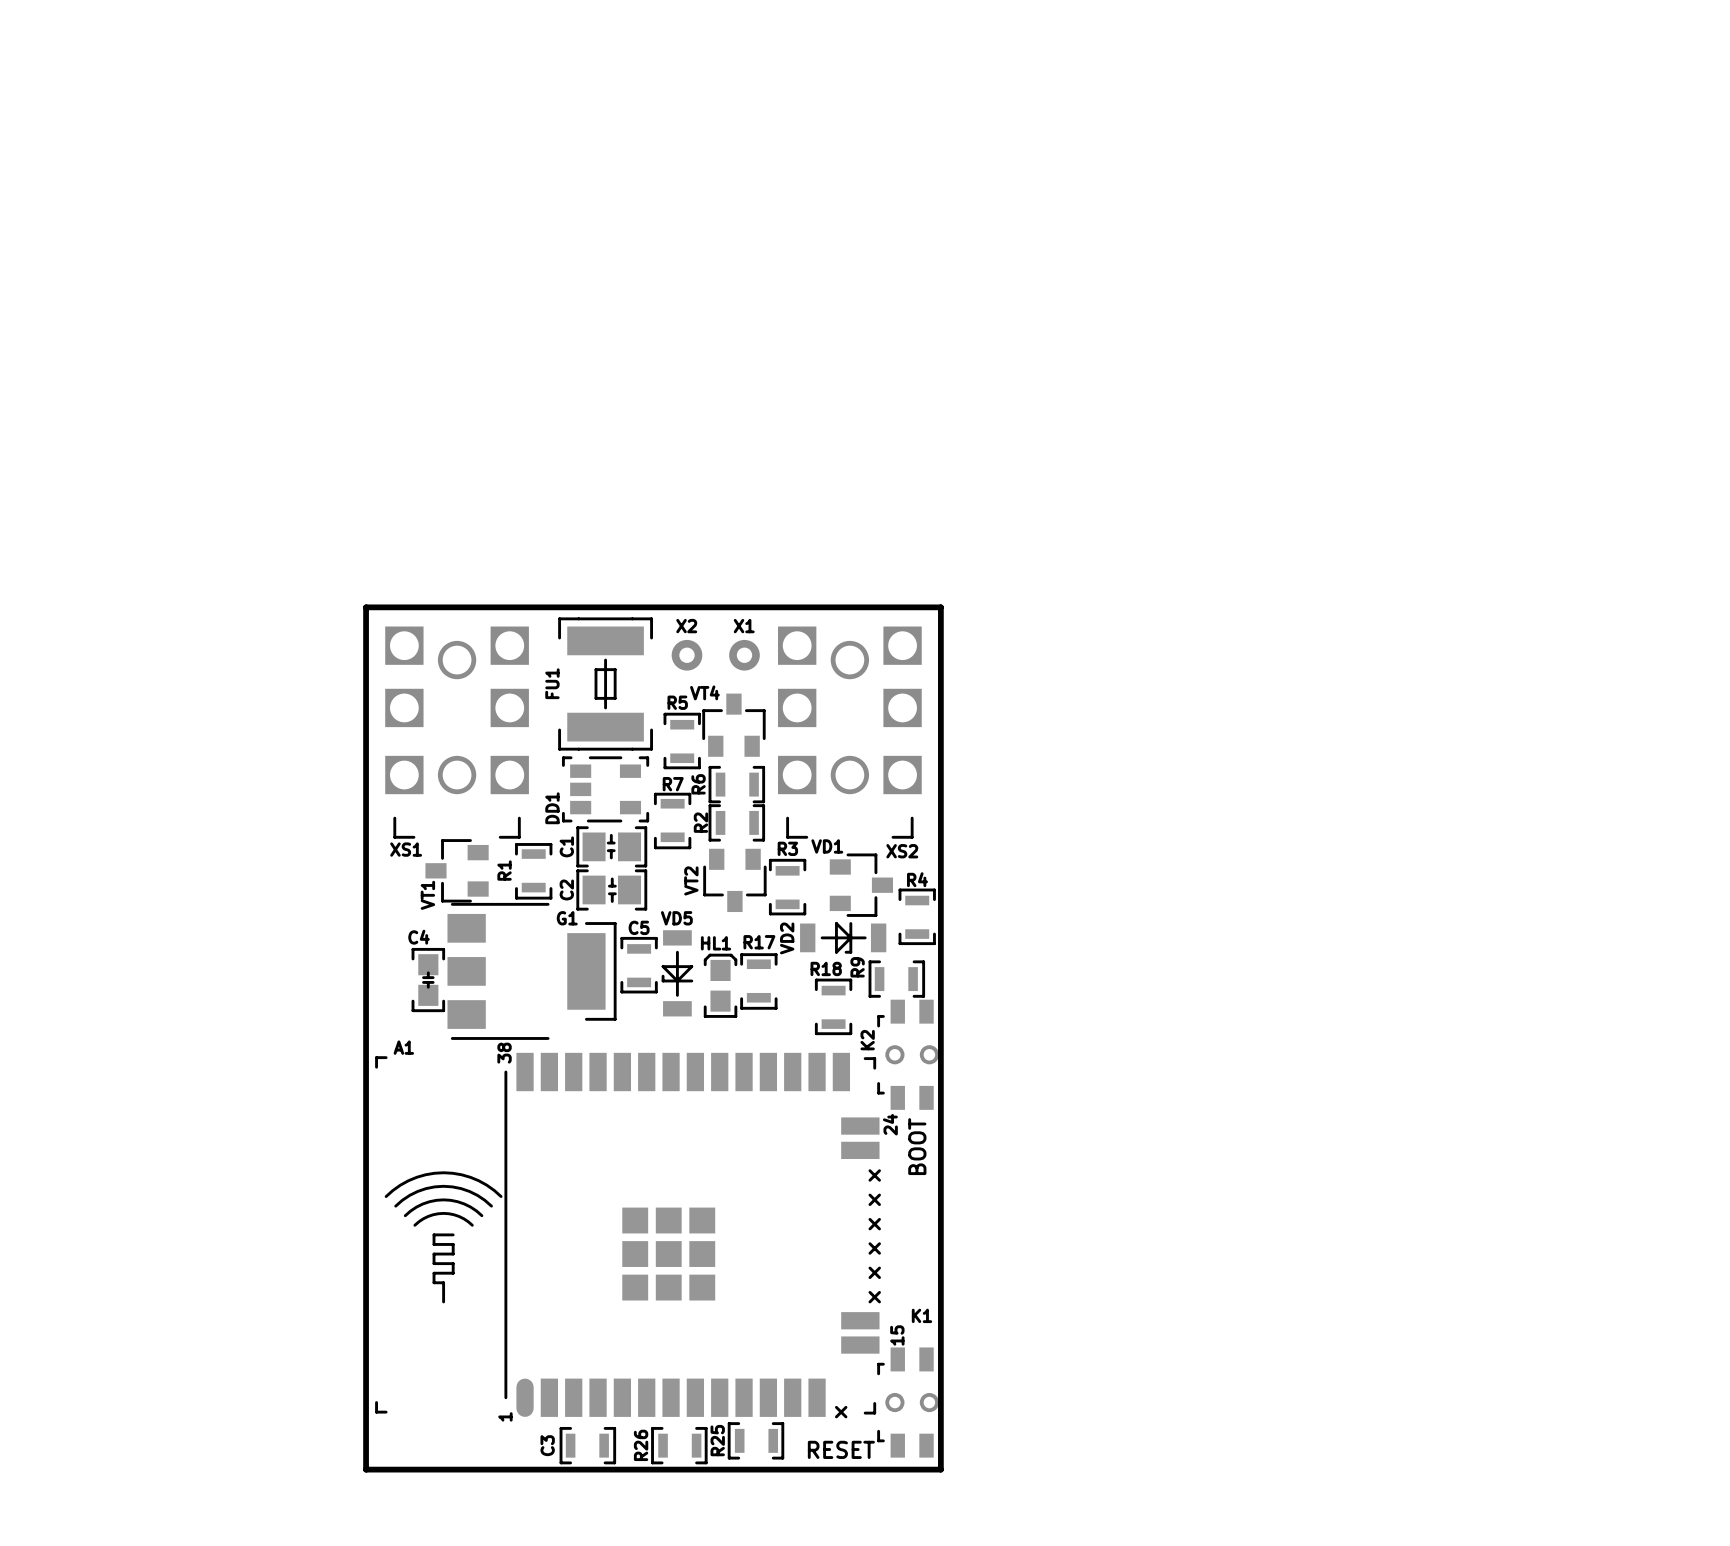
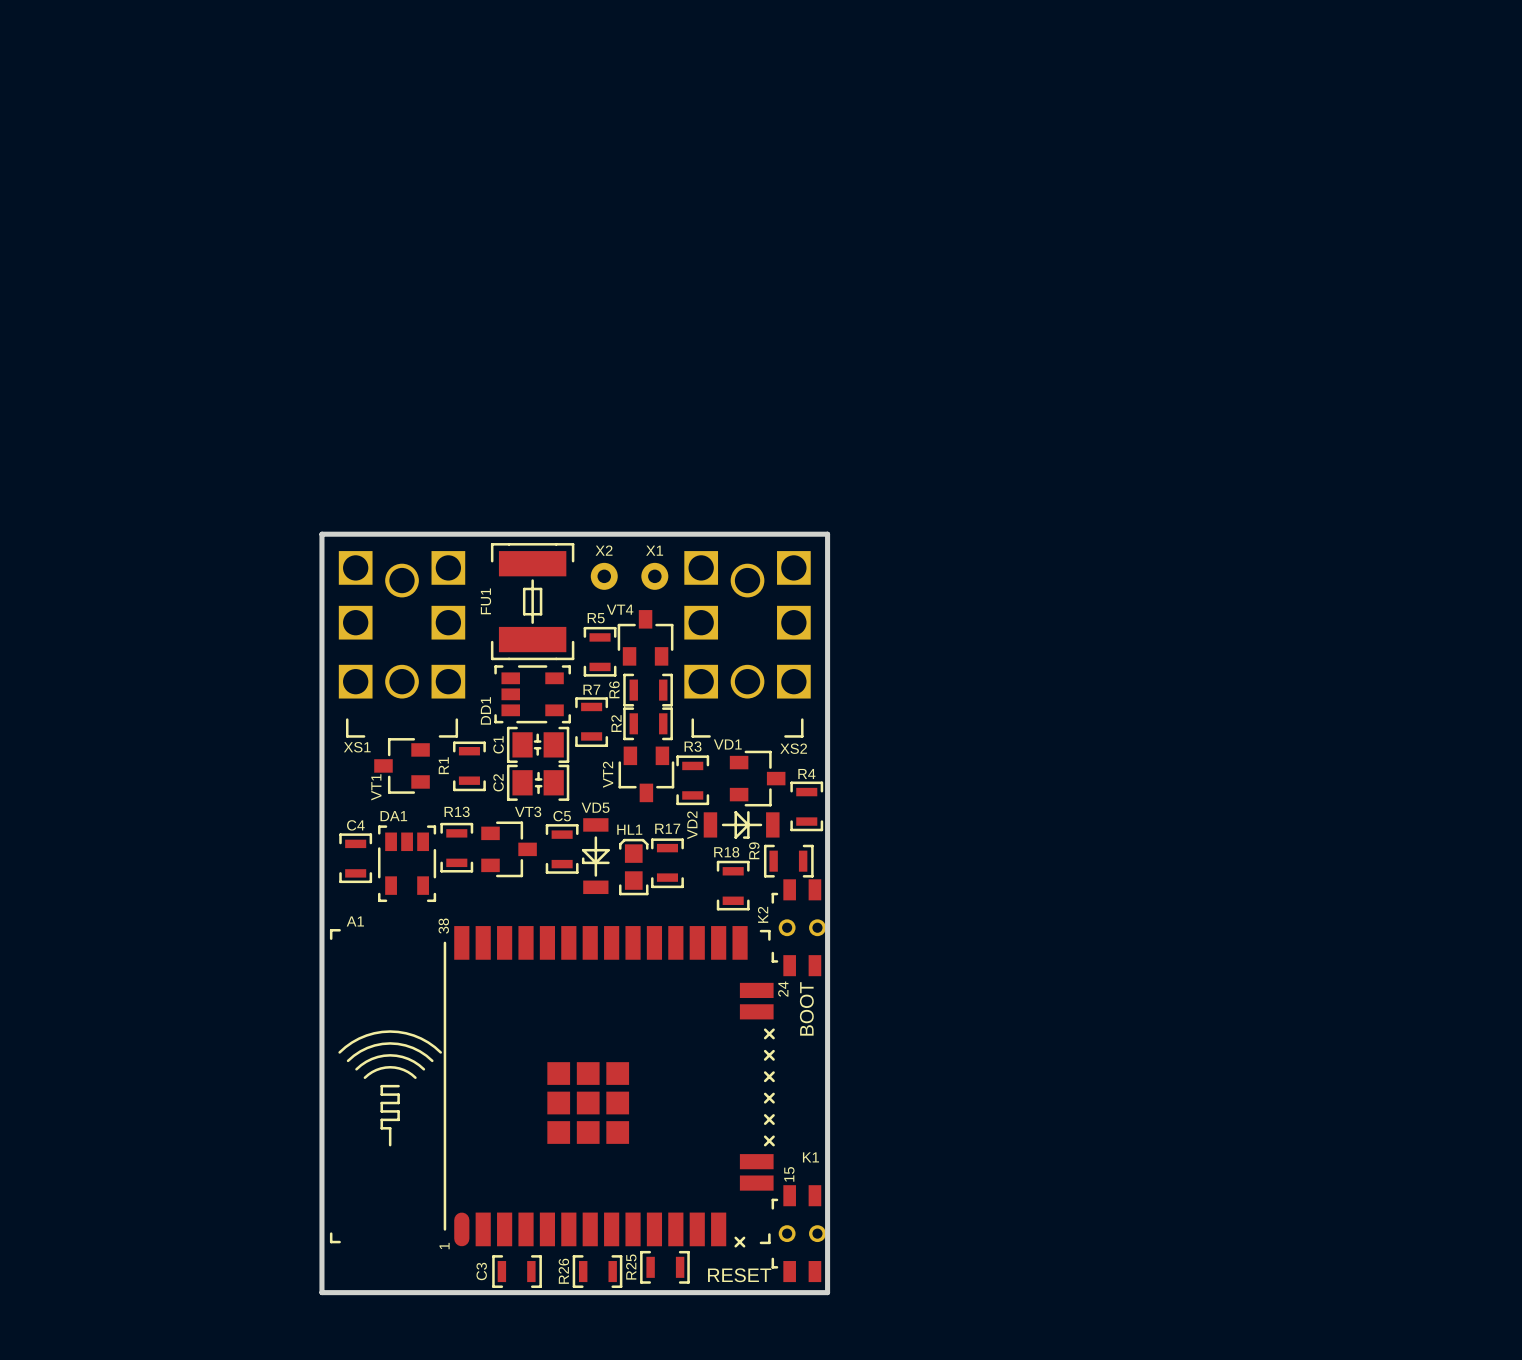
C4 footprint: [411, 947, 446, 1013] -> [339, 833, 373, 884]
R13: none -> (456, 847)
VT3: none -> (509, 849)
G1: (532, 971) -> none
DA1: none -> (407, 863)

